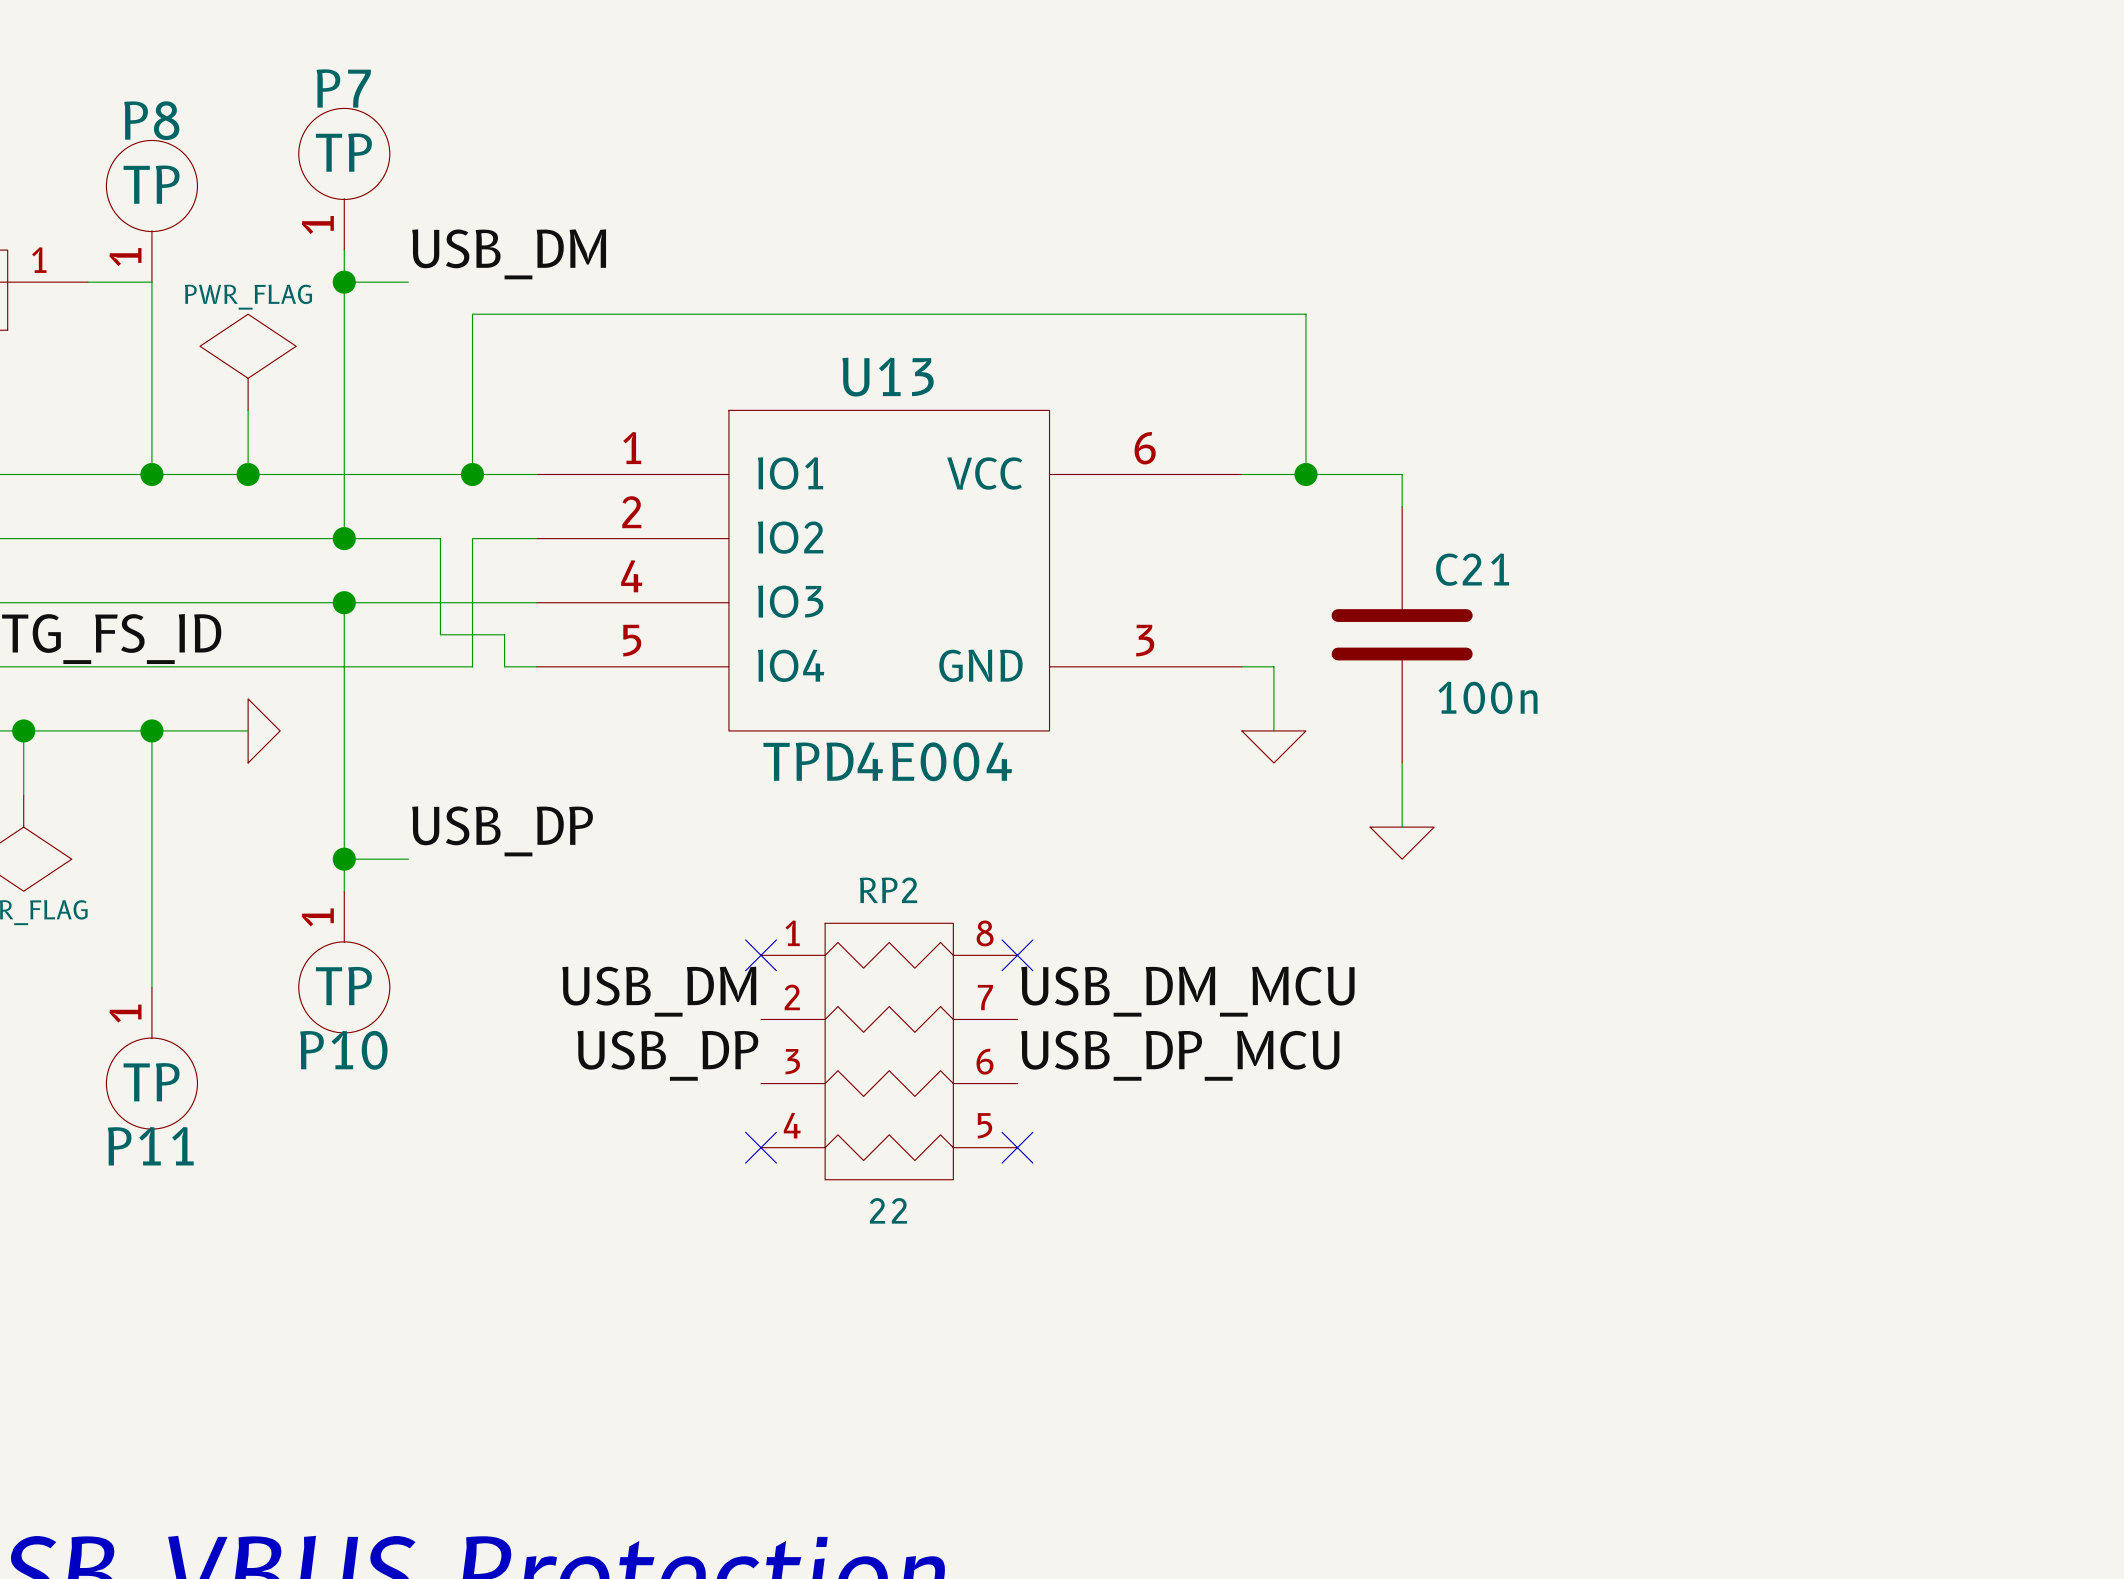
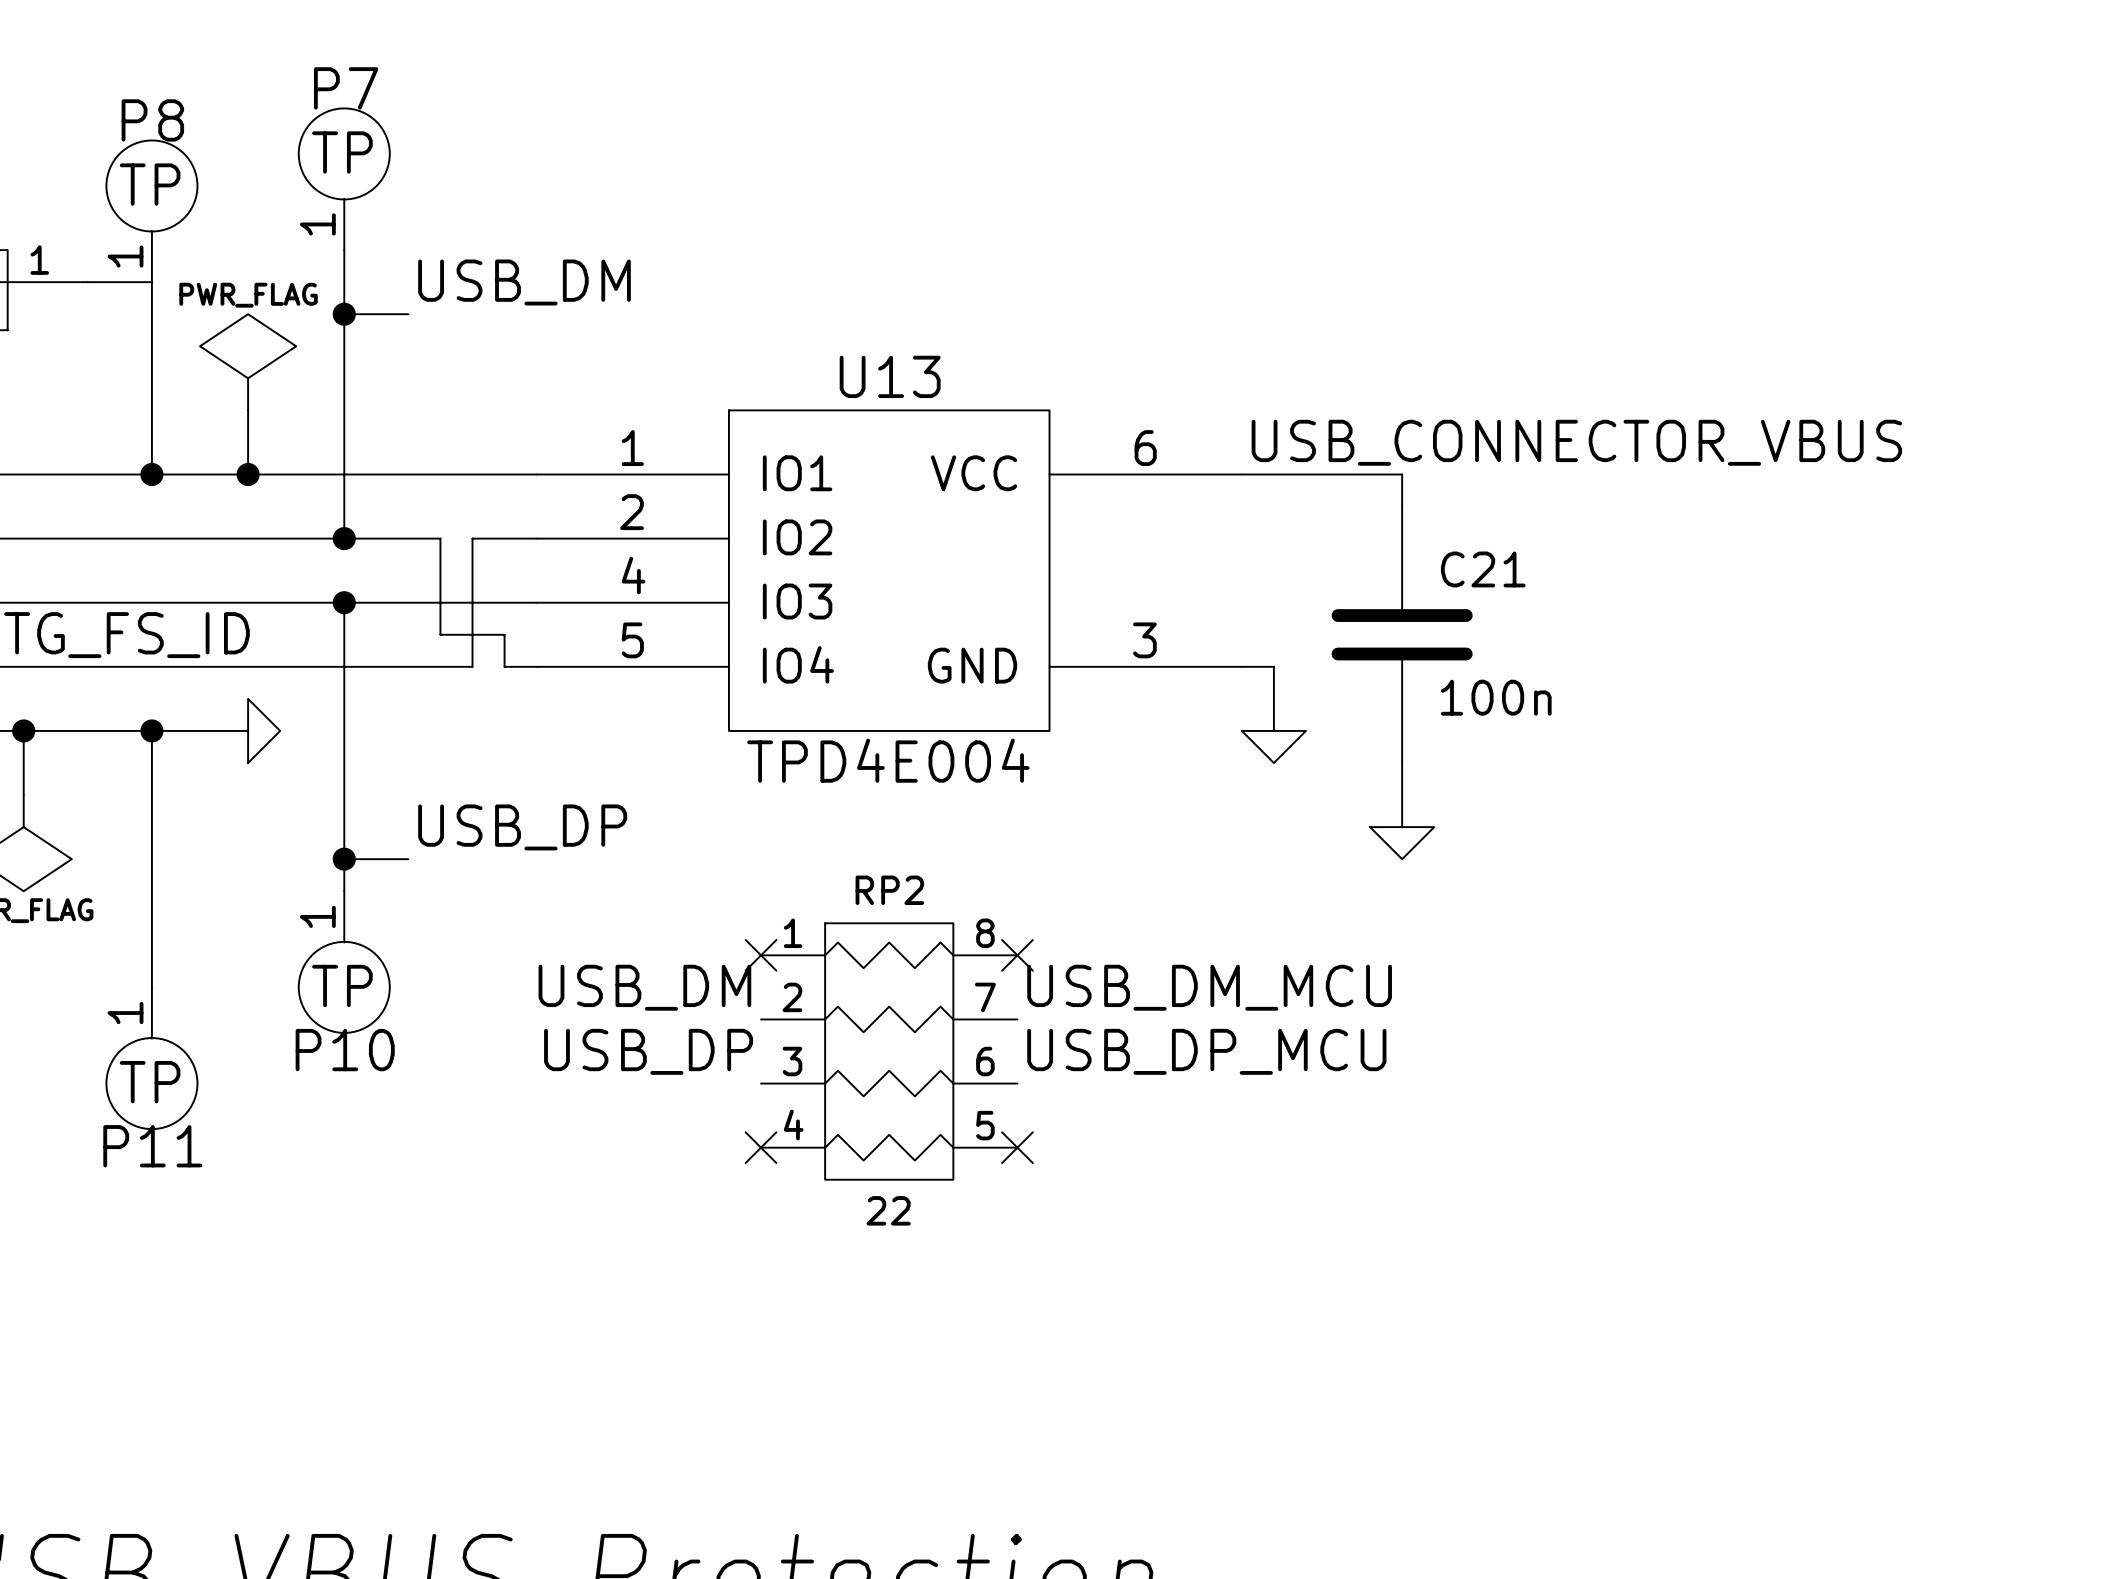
label position: USB_DM (509, 254) -> USB_DM (524, 282)
wire: (344, 282) (408, 282) -> (344, 314) (408, 314)
junction position: (344, 282) -> (344, 314)
label: none -> USB_CONNECTOR_VBUS (1576, 442)
wire: (472, 474) (472, 314) (1305, 314) (1305, 474) -> none
junction: (472, 474) -> none
junction: (1305, 474) -> none

